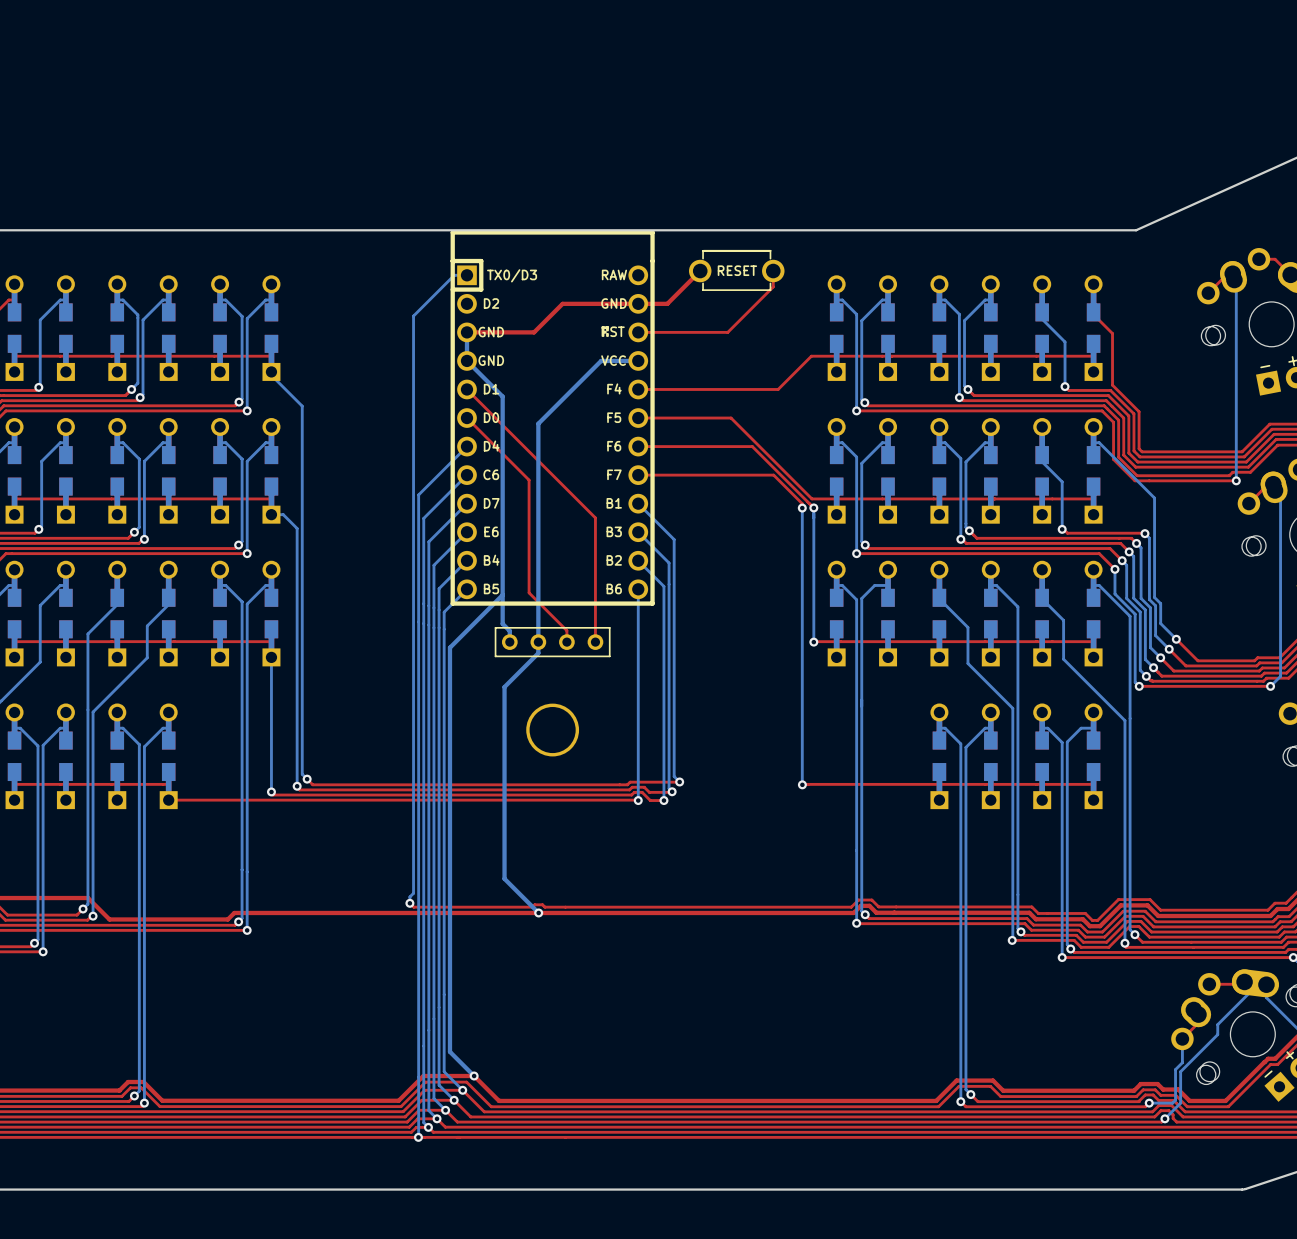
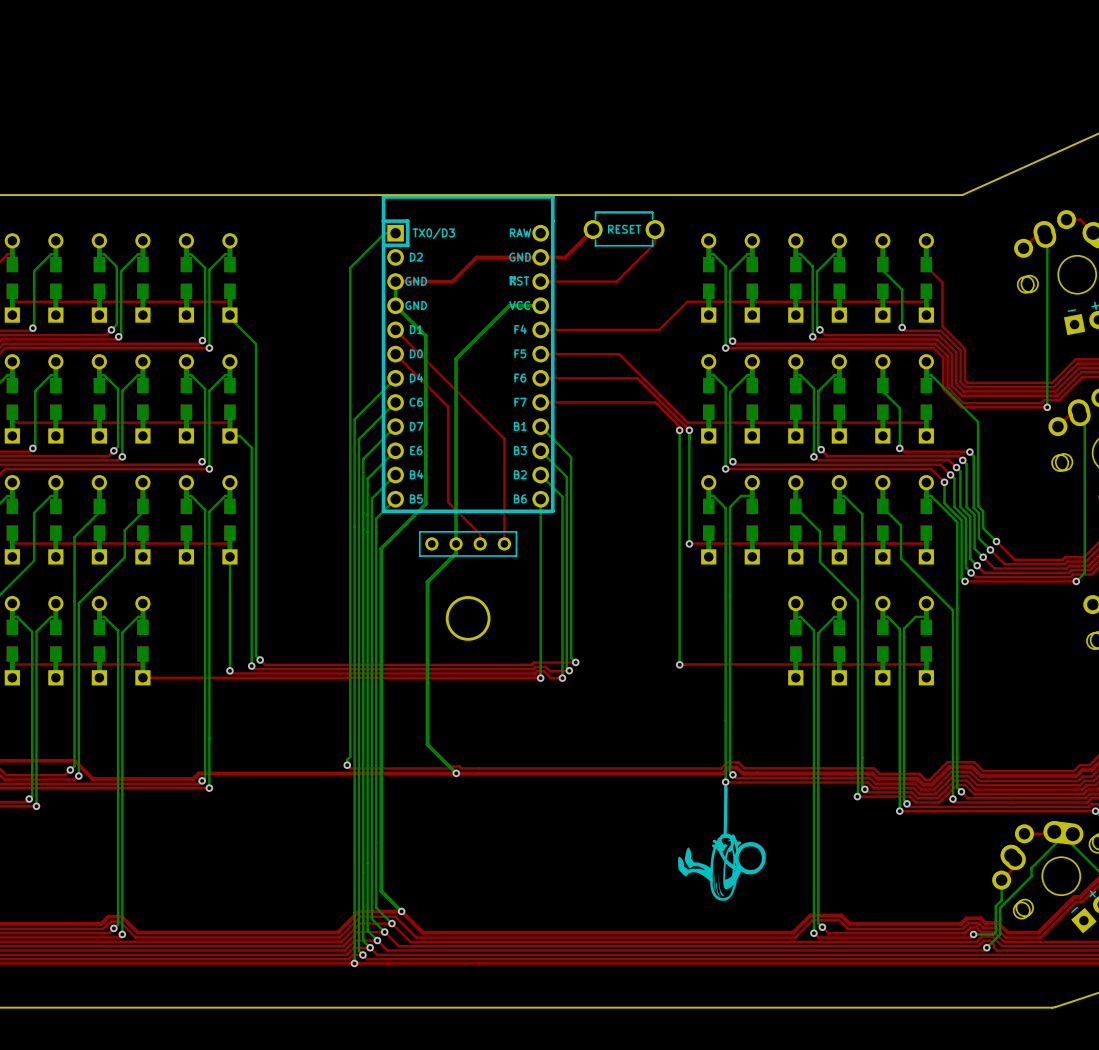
bottom track: (502, 595) (502, 623) (509, 631) (509, 642) -> none
drawing: none -> [678, 785, 766, 901]

